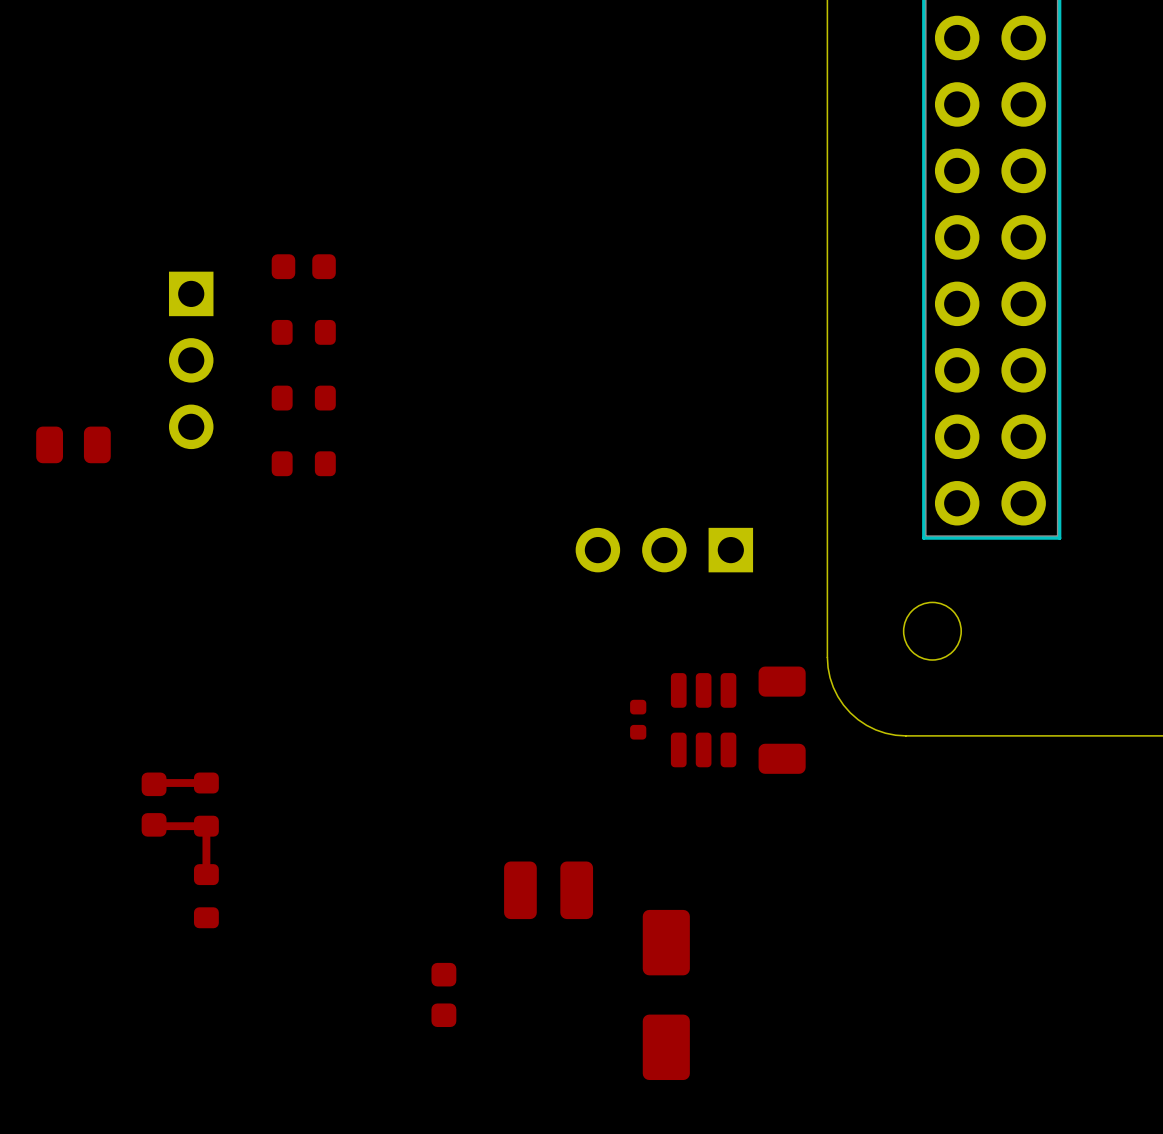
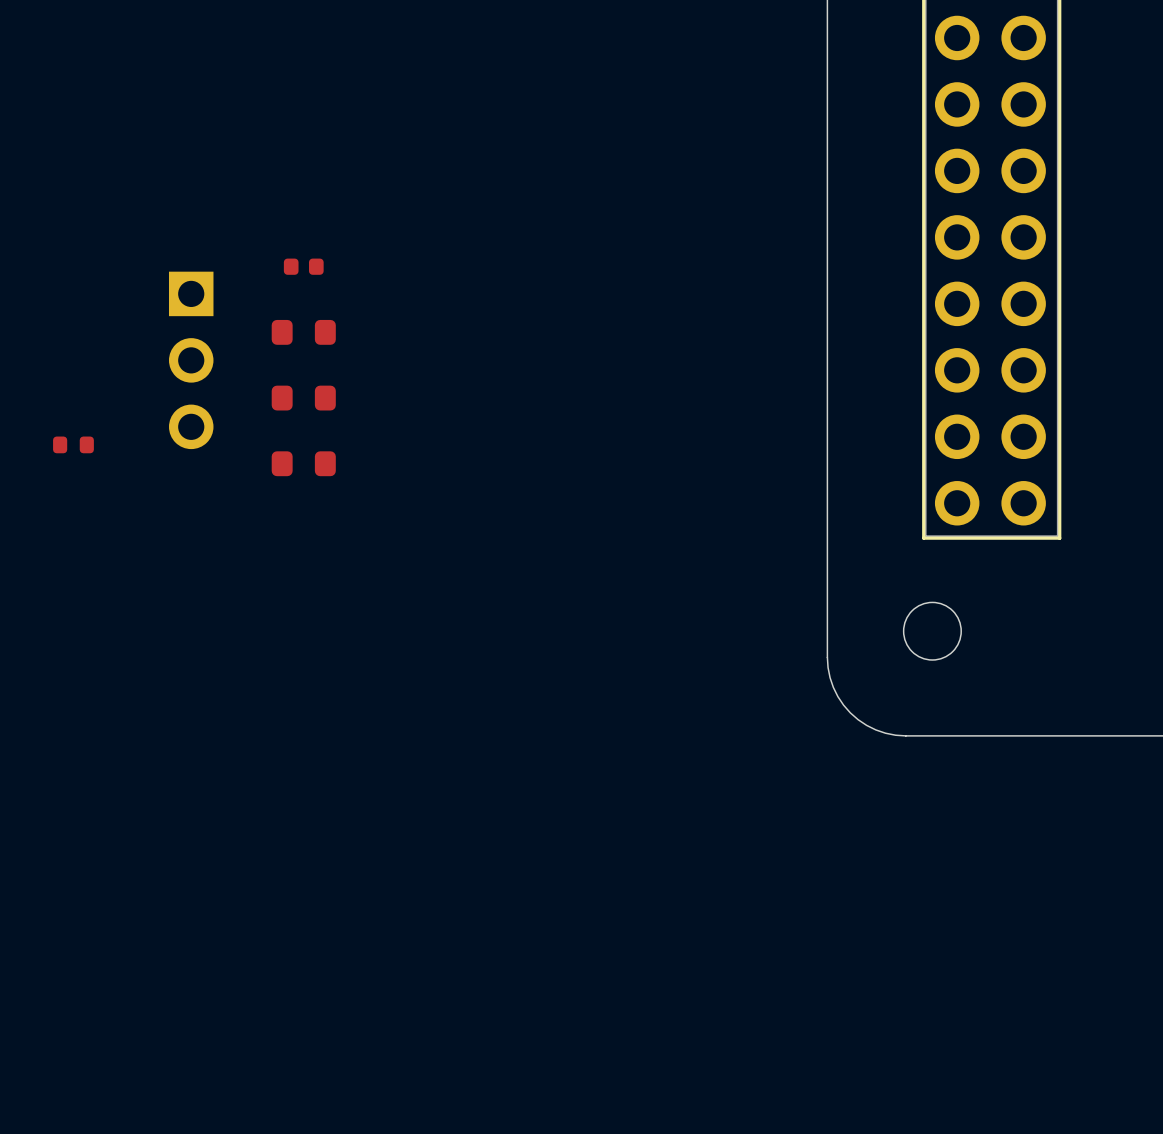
part footprint: [271, 254, 336, 280] -> [283, 258, 324, 275]
part footprint: [36, 426, 111, 464] -> [53, 436, 94, 454]
part: (664, 550) -> none
part: (638, 719) -> none
part: (703, 720) -> none
part: (782, 720) -> none
top track: (206, 783) (154, 784) -> none
part: (154, 804) -> none
part: (206, 804) -> none
top track: (154, 824) (206, 826) (206, 874) -> none
part: (548, 890) -> none
part: (206, 896) -> none
part: (443, 994) -> none
part: (666, 994) -> none

